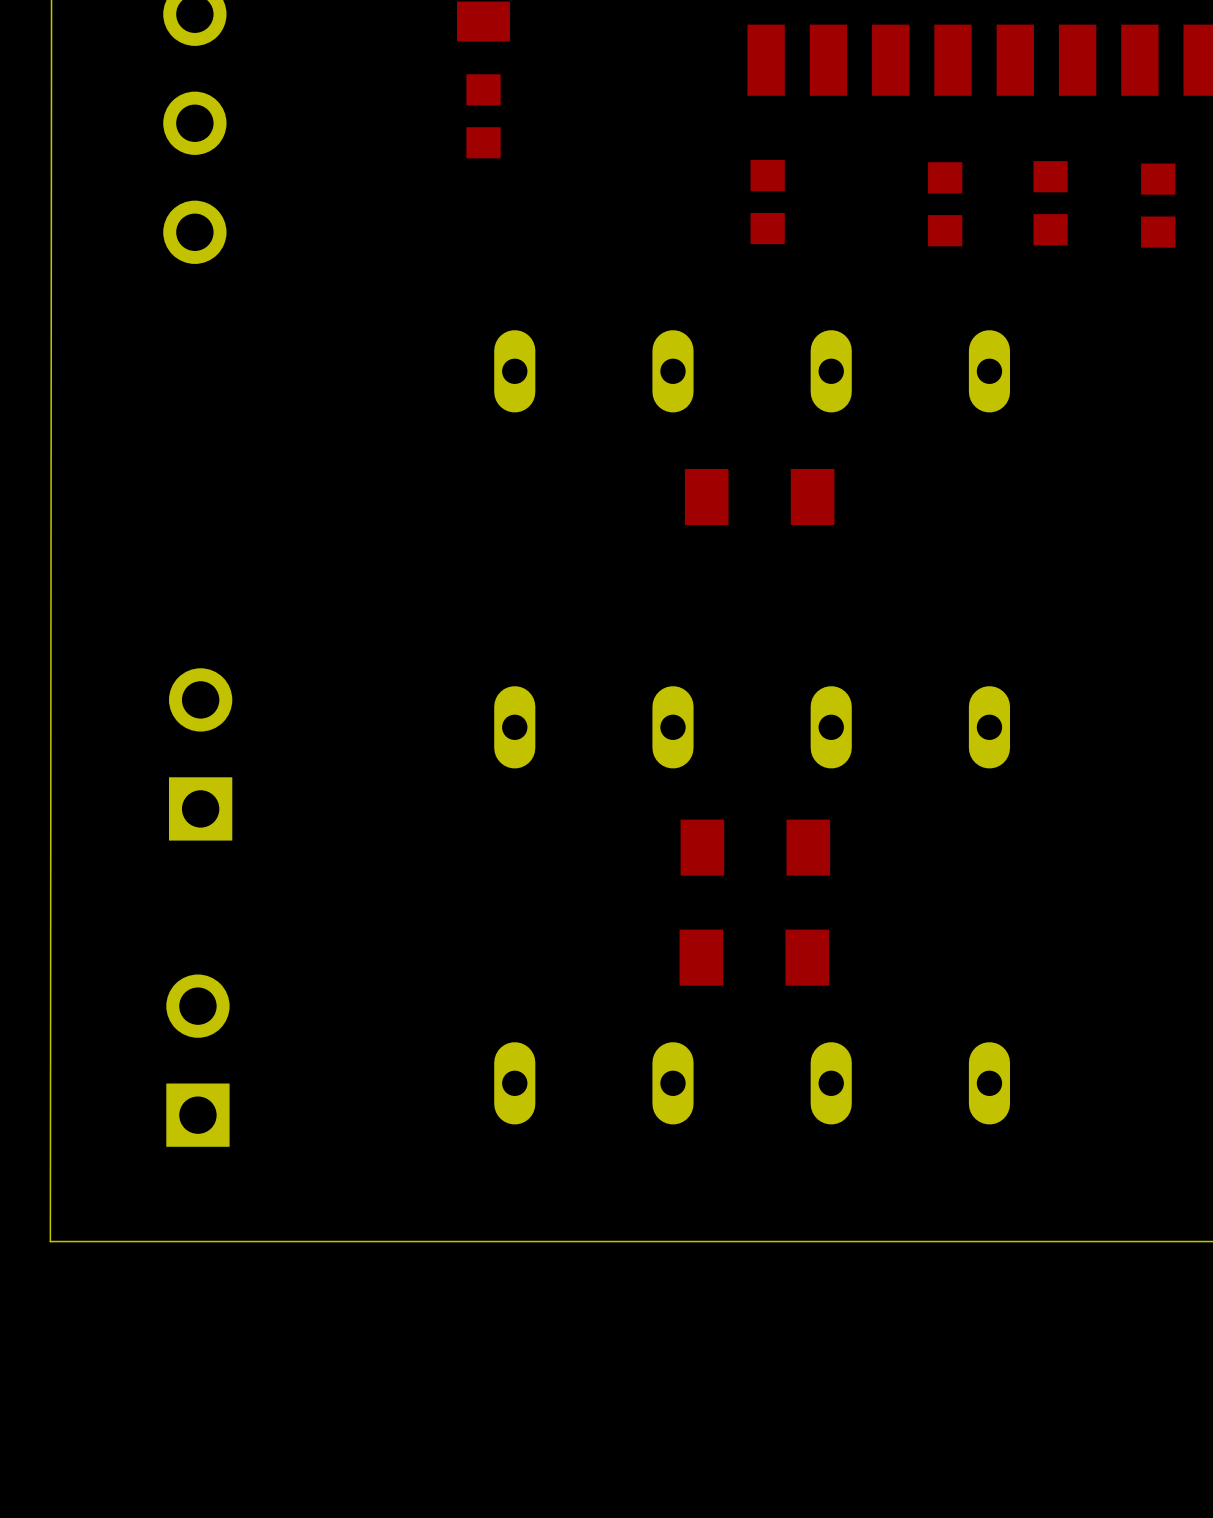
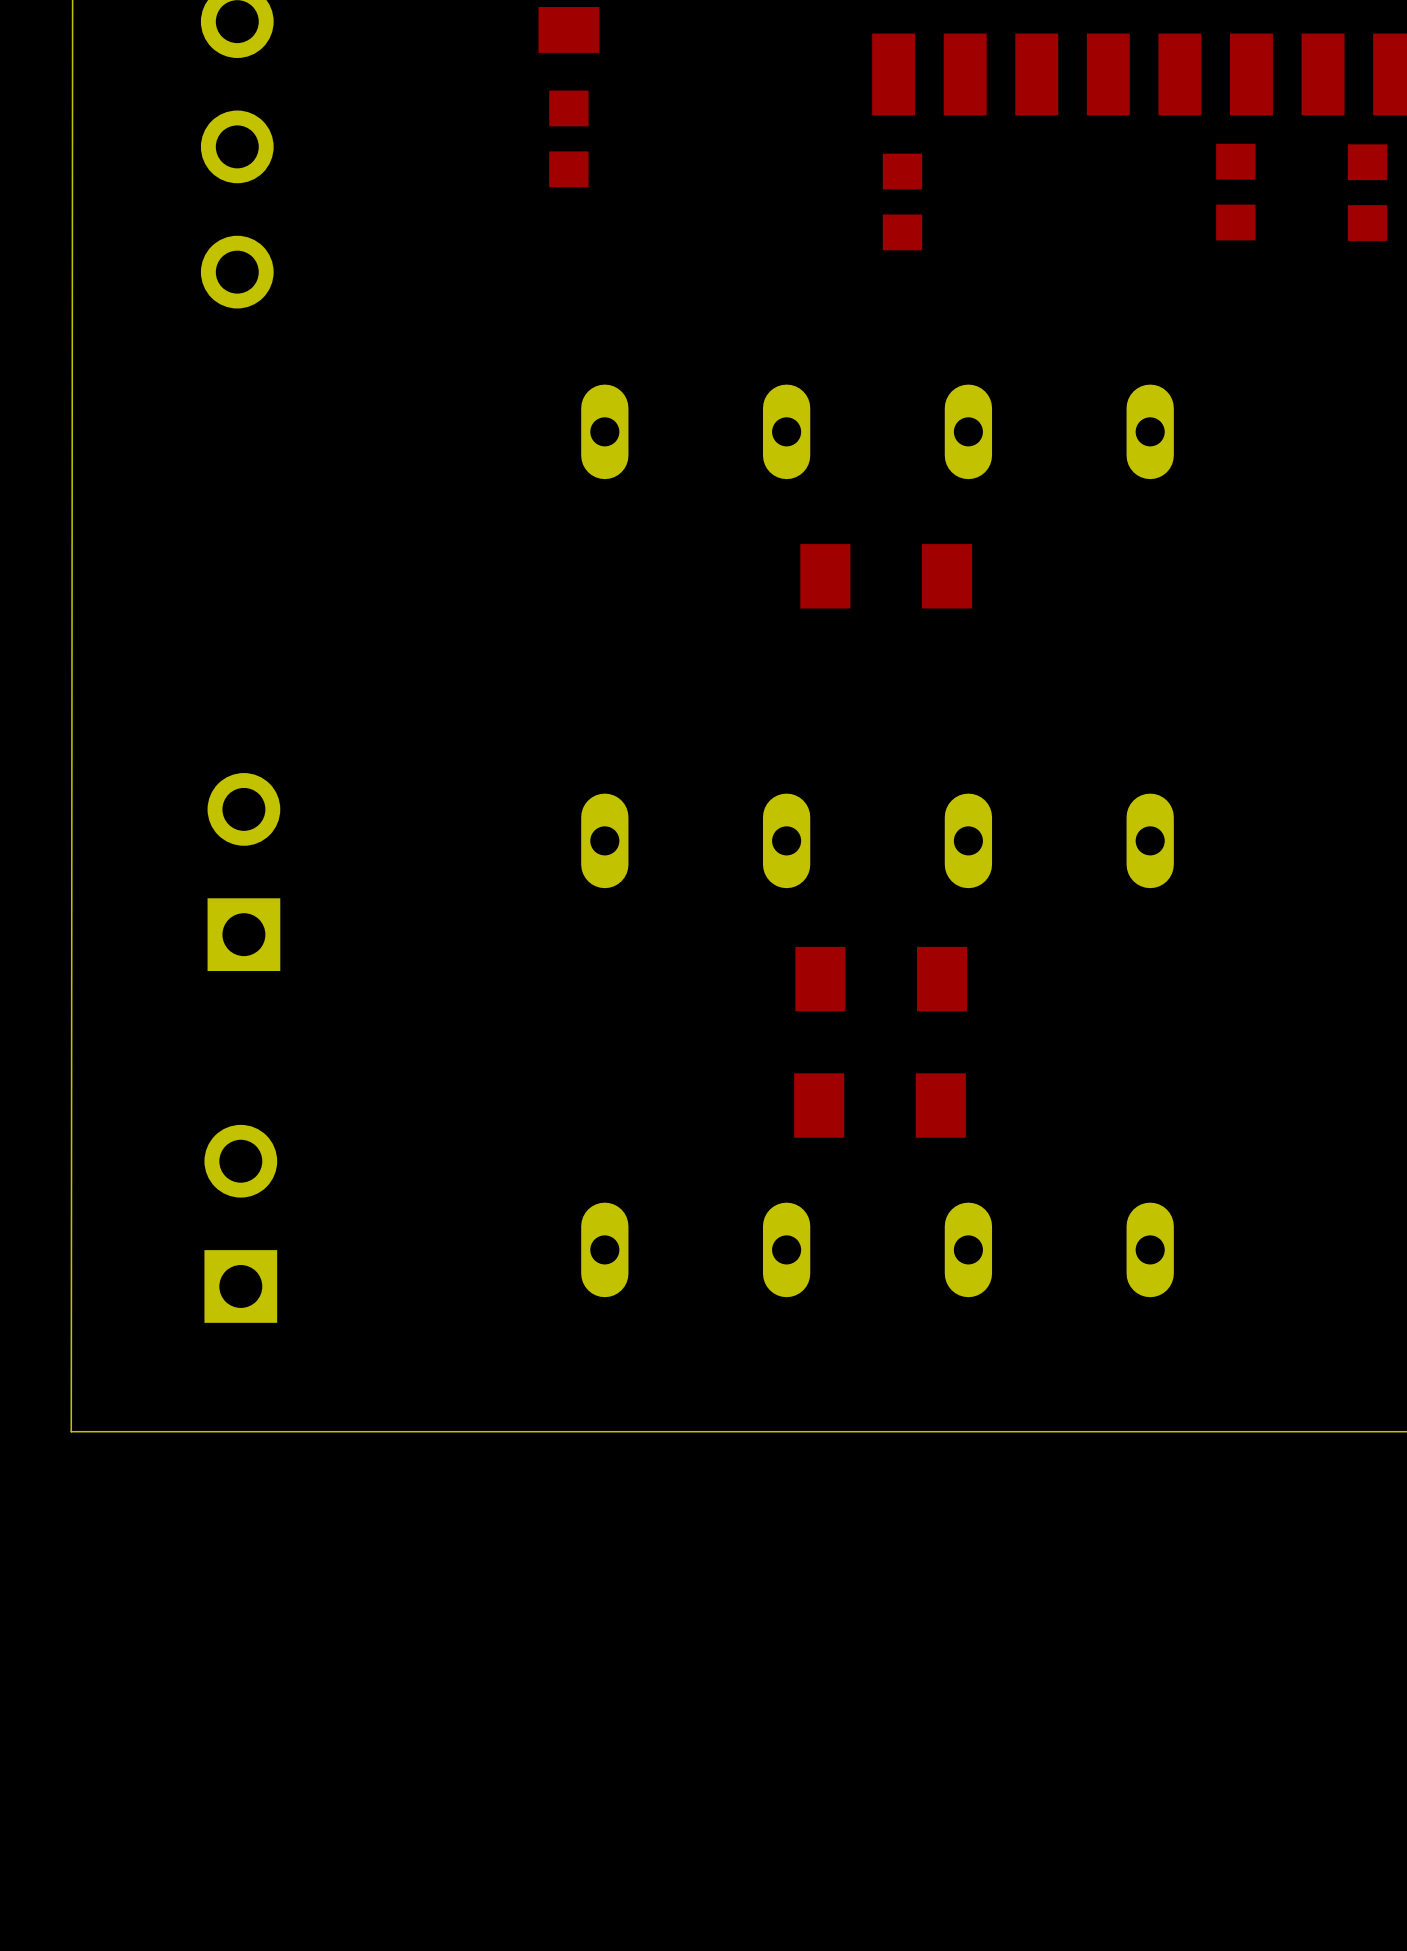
part position: (767, 202) -> (902, 201)
part position: (1050, 203) -> (1235, 192)
part: (945, 204) -> none
part position: (1158, 205) -> (1367, 192)

